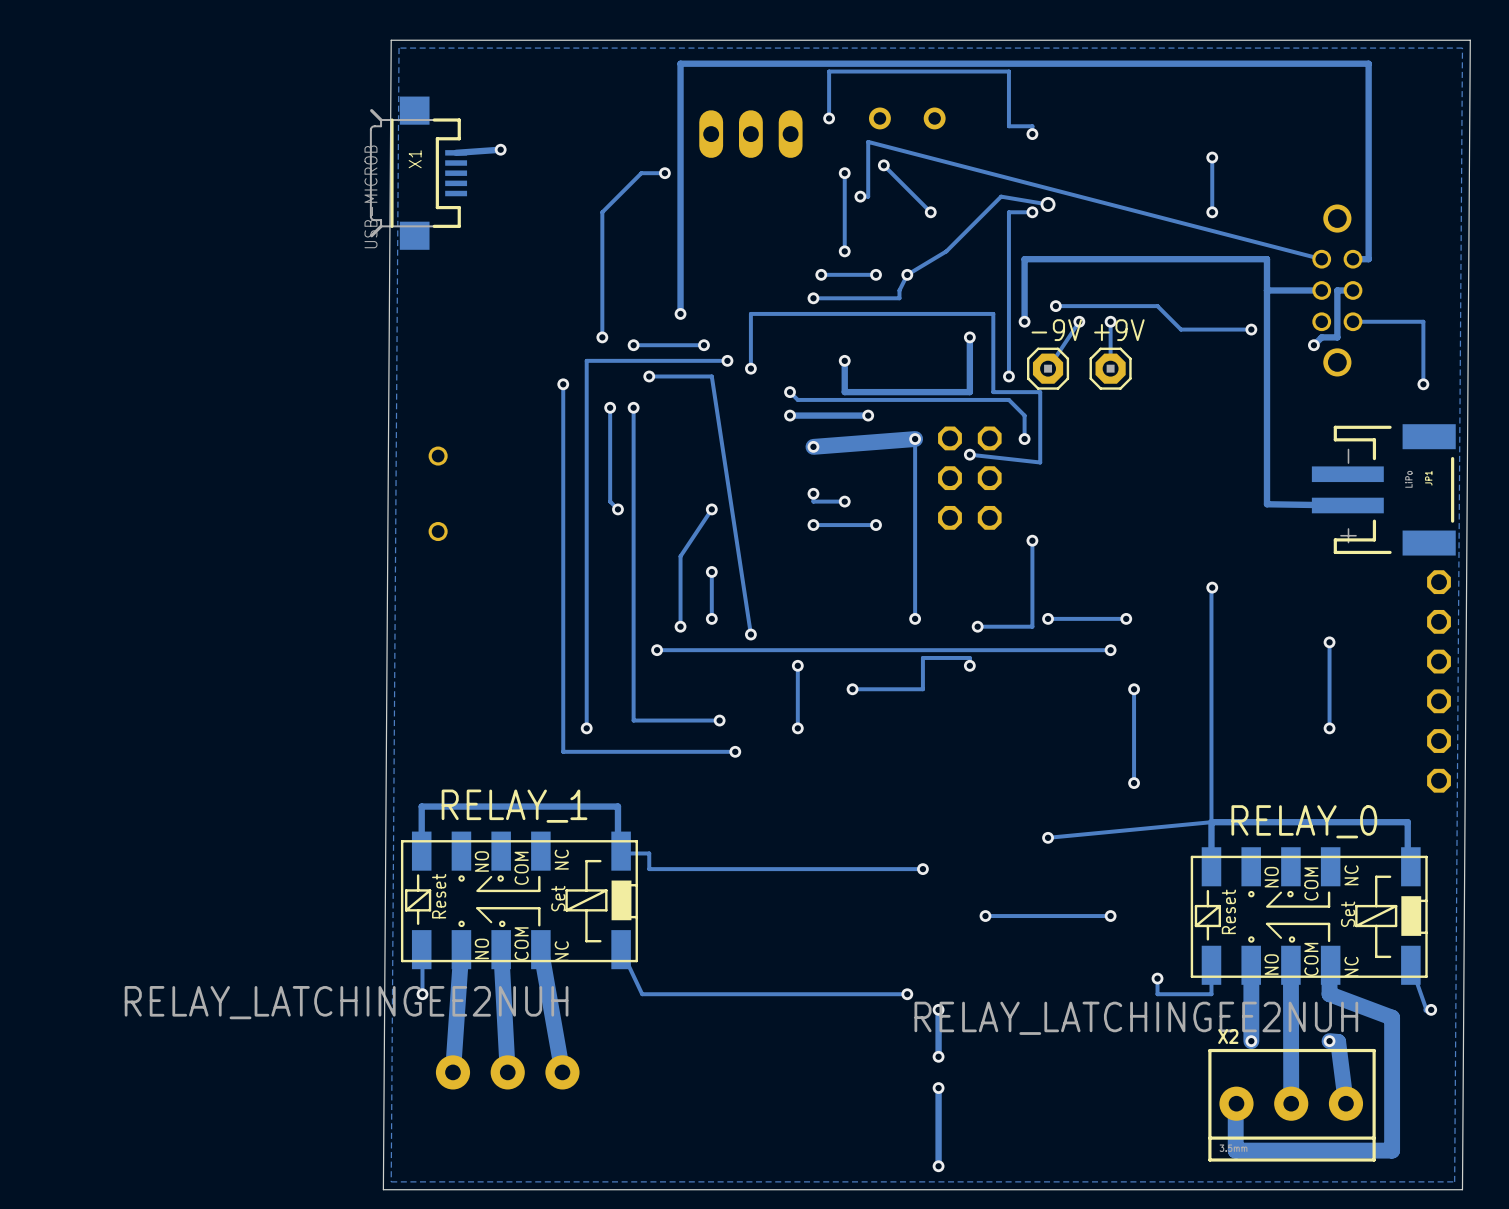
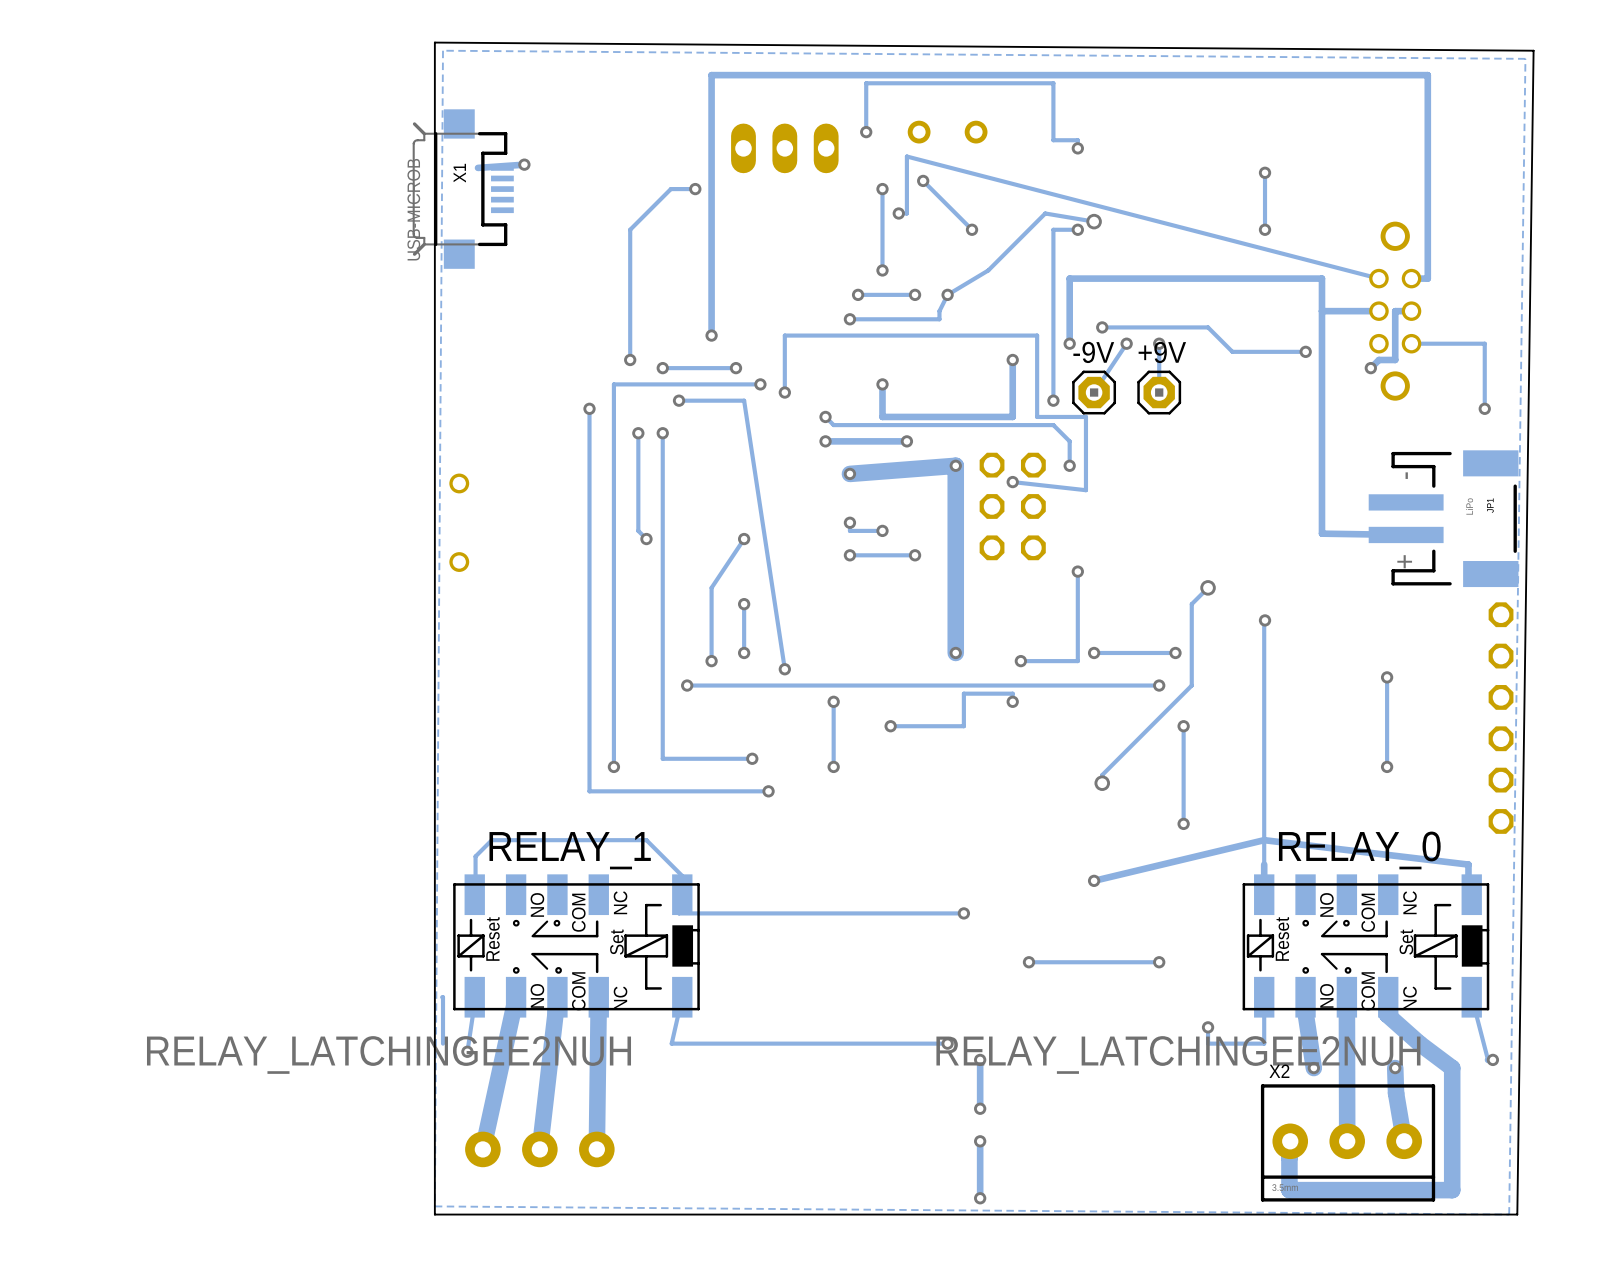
board edge: (1470, 40) (391, 40) (383, 1189) (1462, 1189) (1470, 40) -> (434, 42) (1533, 50) (1517, 1214) (434, 1214) (434, 42)
zone outline: (1462, 48) (399, 48) (391, 1181) (1454, 1181) (1462, 48) -> (443, 50) (1525, 58) (1509, 1214) (434, 1206) (443, 50)
X1 position: (418, 173) -> (463, 189)
track width: thin (915, 439) (915, 618) -> thick (955, 465) (955, 652)
track: none -> (1208, 587) (1191, 604) (1191, 685) (1102, 775) (1102, 783)
via: none -> (1208, 587)
via: none -> (1102, 783)
track: (1407, 822) (1211, 822) (1048, 837) -> (1468, 864) (1264, 840) (1094, 880)
track: (421, 851) (421, 806) (617, 806) (617, 851) (621, 851) (621, 853) (649, 853) -> none
track: none -> (682, 894) (682, 875) (646, 840) (491, 840) (475, 856) (474, 894)
RELAY_1 position: (519, 900) -> (576, 945)
RELAY_0 position: (1309, 916) -> (1365, 945)
track: none -> (474, 997) (467, 1051)
track: (461, 949) (452, 1072) -> none
track: none -> (516, 997) (482, 1149)
track: (501, 949) (507, 1072) -> none
track: none -> (557, 997) (539, 1149)
track: (540, 949) (562, 1072) -> none
track: none -> (598, 997) (596, 1149)
track: (621, 949) (642, 994) -> (682, 997) (671, 1043)
track: none -> (1305, 997) (1305, 1013) (1313, 1068)
track: (1251, 965) (1251, 1041) -> none
track: (1330, 965) (1329, 994) (1392, 1017) -> (1388, 997) (1387, 1014) (1419, 1043) (1452, 1068)
track: (1410, 965) (1426, 1009) -> (1471, 997) (1488, 1059)
via position: (422, 994) -> (467, 1051)
track: none -> (1395, 1068) (1396, 1093) (1404, 1141)
via position: (1251, 1041) -> (1313, 1068)
track: (1329, 1041) (1338, 1041) (1345, 1103) -> none
via position: (1329, 1041) -> (1395, 1068)
part position: (507, 1072) -> (539, 1149)
X2 position: (1292, 1105) -> (1348, 1142)
track: (1392, 1134) (1392, 1150) (1235, 1150) (1235, 1134) -> (1452, 1190) (1289, 1190)
track: (938, 1142) (938, 1166) -> none
via position: (938, 1166) -> (980, 1198)

